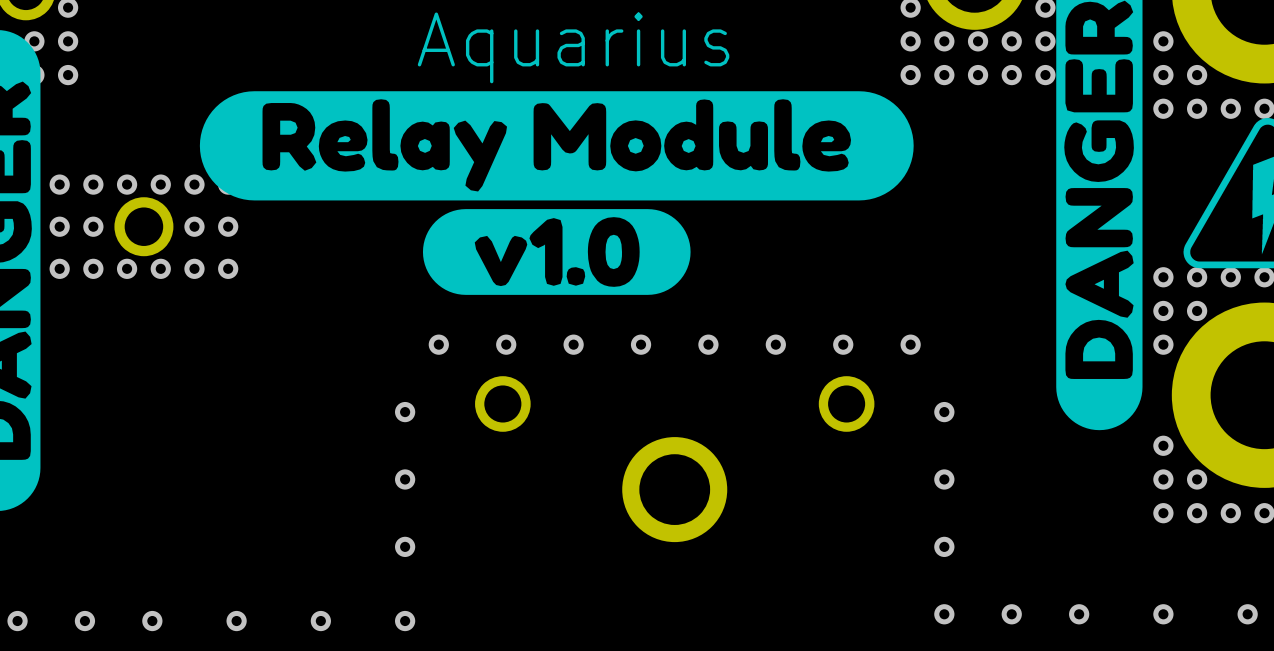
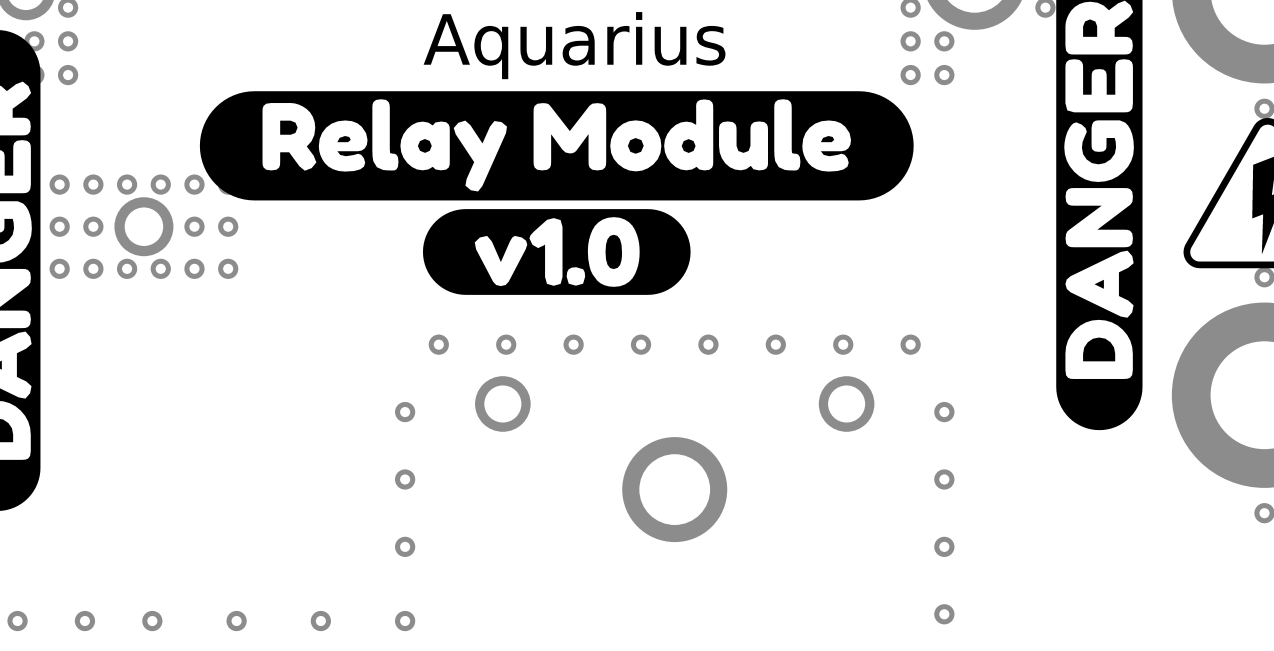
via: (978, 41) -> none
via: (1011, 41) -> none
via: (1045, 41) -> none
via: (1163, 41) -> none
via: (978, 75) -> none
via: (1011, 75) -> none
via: (1045, 75) -> none
via: (1163, 75) -> none
via: (1197, 75) -> none
via: (1163, 108) -> none
via: (1197, 108) -> none
via: (1230, 108) -> none
via: (1163, 277) -> none
via: (1197, 277) -> none
via: (1230, 277) -> none
via: (1163, 310) -> none
via: (1197, 310) -> none
via: (1163, 344) -> none
via: (1163, 445) -> none
via: (1163, 479) -> none
via: (1197, 479) -> none
via: (1163, 513) -> none
via: (1197, 513) -> none
via: (1230, 513) -> none
via: (1011, 614) -> none
via: (1079, 614) -> none
via: (1163, 614) -> none
via: (1247, 614) -> none

